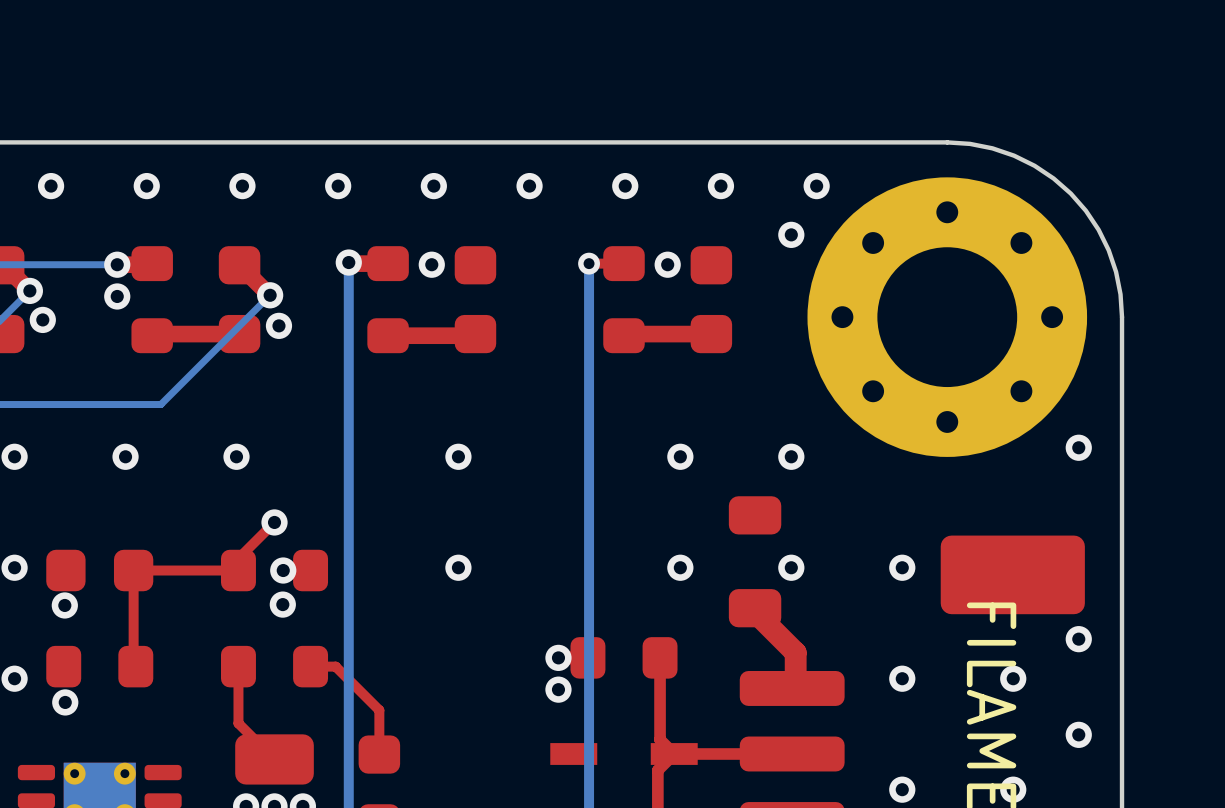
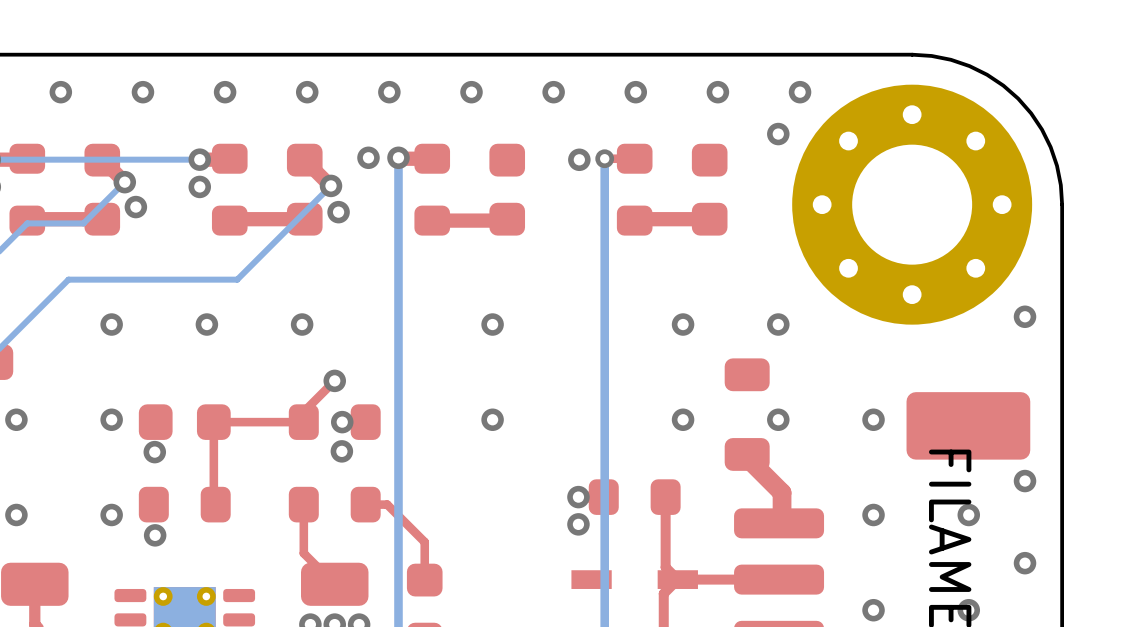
via: none -> (368, 157)
via: (431, 264) -> none
via: none -> (579, 159)
via: (667, 264) -> none

